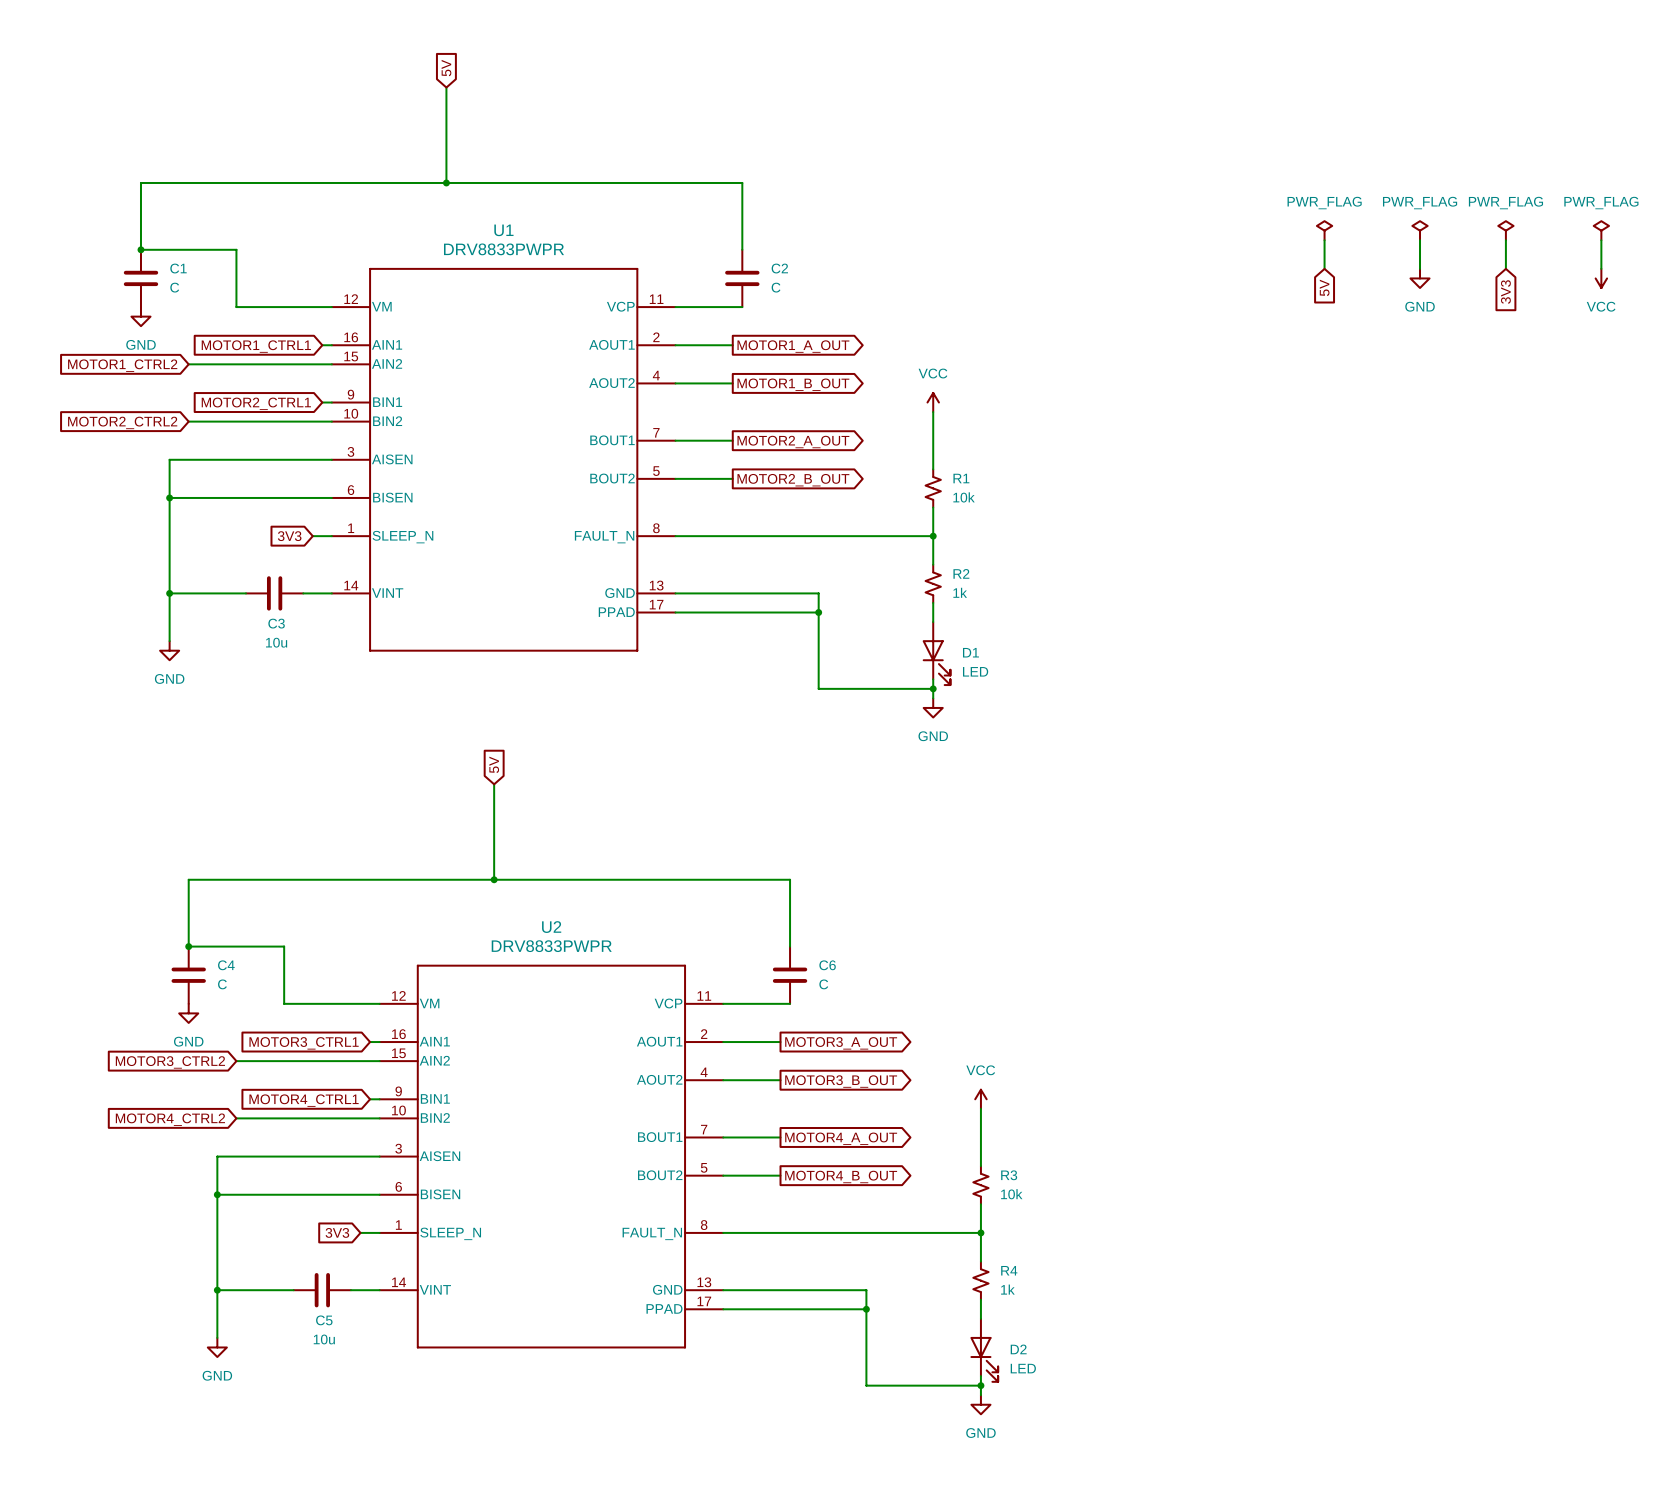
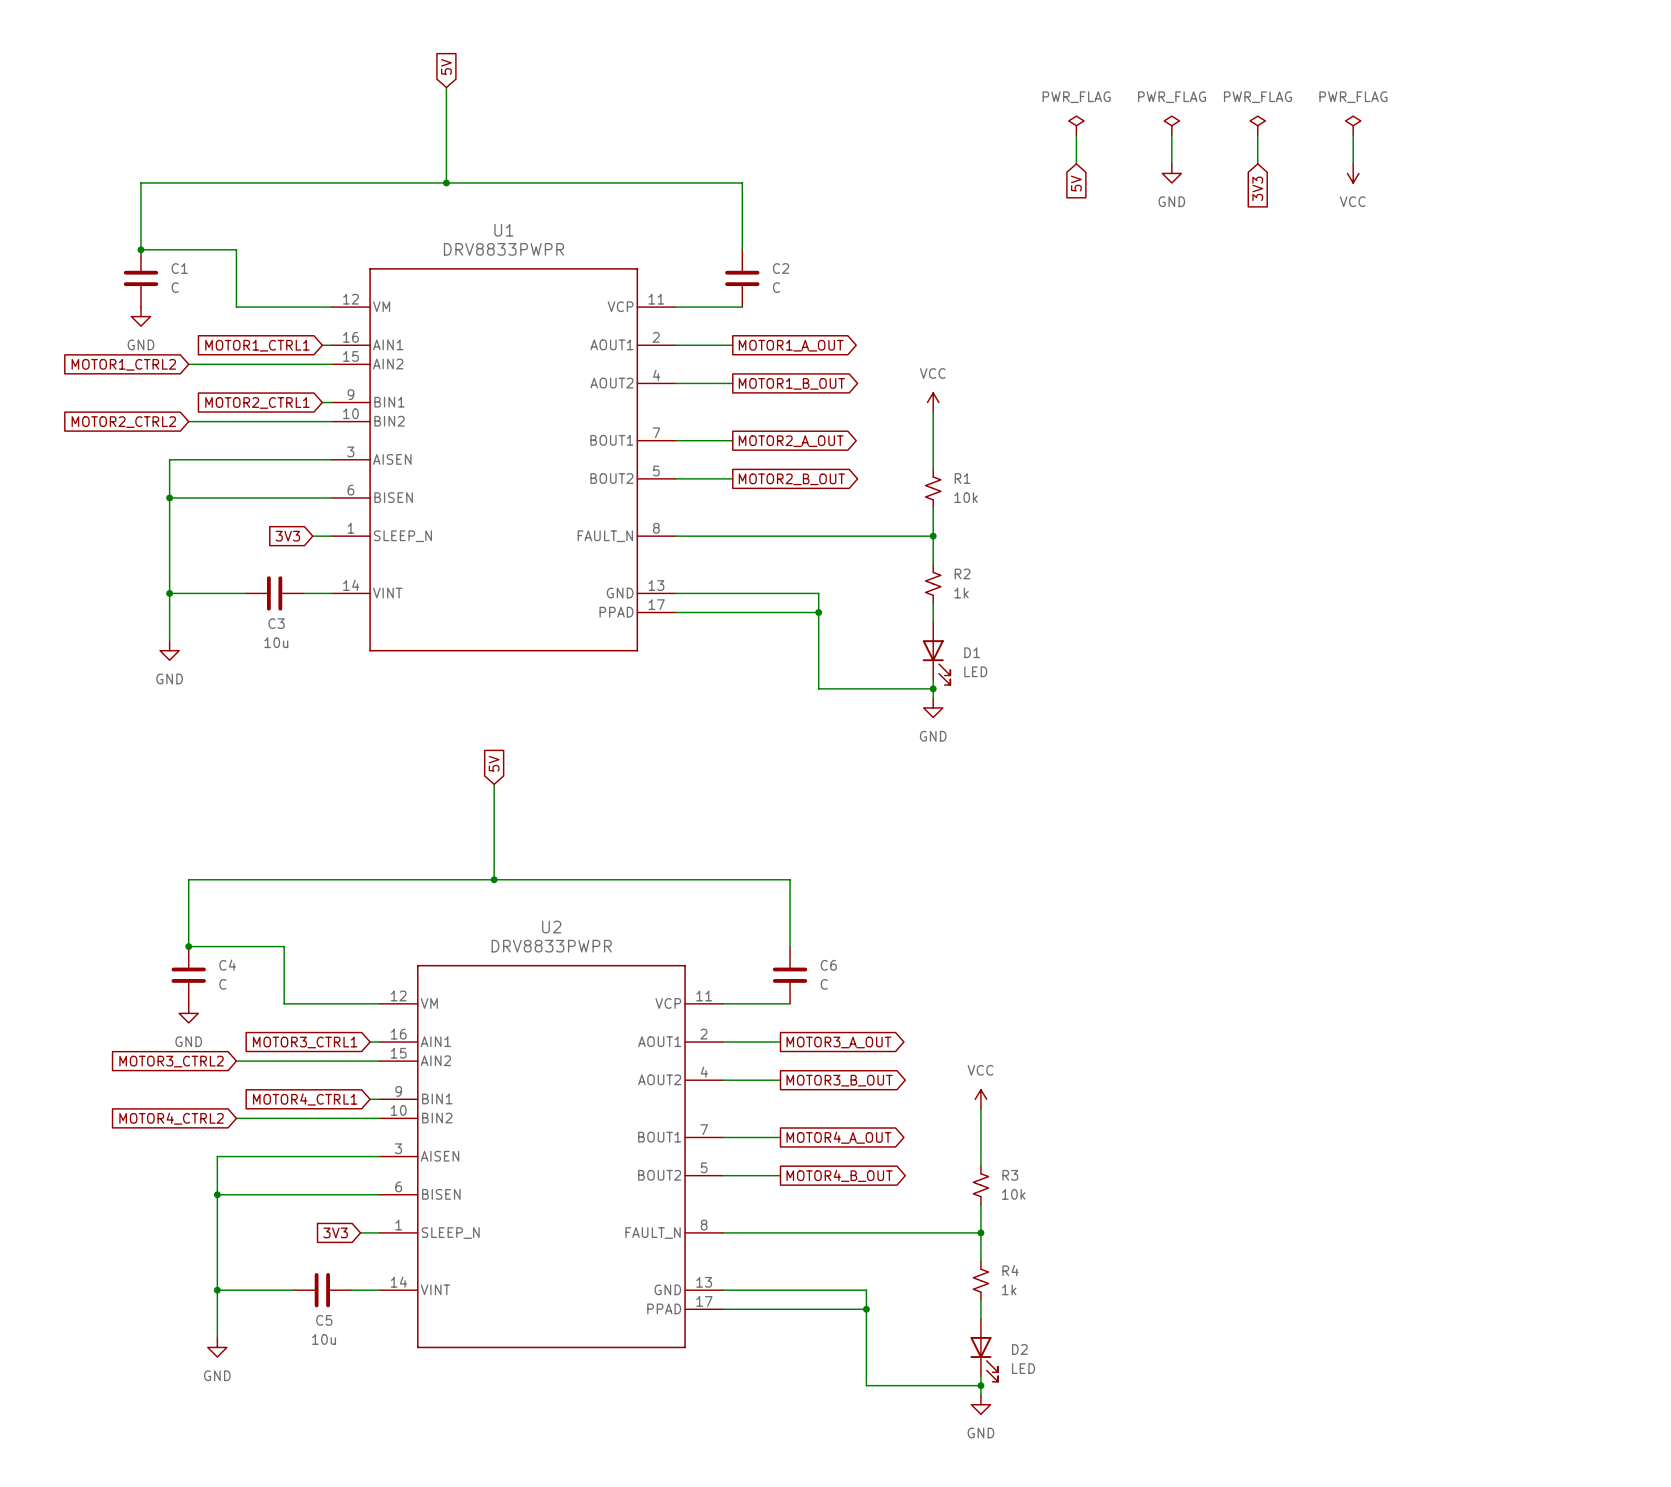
power symbol: none -> PWR_FLAG (1076, 125)
power symbol: none -> PWR_FLAG (1171, 125)
power symbol: none -> PWR_FLAG (1257, 125)
power symbol: none -> PWR_FLAG (1353, 125)
wire: none -> (1076, 135) (1076, 163)
wire: none -> (1171, 135) (1171, 163)
power symbol: none -> GND (1171, 173)
power symbol: none -> VCC (1353, 173)
global label: none -> 5V (1076, 183)
global label: none -> 3V3 (1257, 188)
power symbol: PWR_FLAG (1324, 230) -> none
power symbol: PWR_FLAG (1420, 230) -> none
power symbol: PWR_FLAG (1505, 230) -> none
power symbol: PWR_FLAG (1601, 230) -> none
wire: (1324, 240) (1324, 268) -> (1257, 135) (1257, 163)
wire: (1420, 240) (1420, 268) -> (1353, 135) (1353, 163)
wire: (1505, 240) (1505, 268) -> none
wire: (1601, 240) (1601, 268) -> none
power symbol: GND (1420, 278) -> none
power symbol: VCC (1601, 278) -> none
global label: 5V (1324, 287) -> none
global label: 3V3 (1505, 292) -> none

